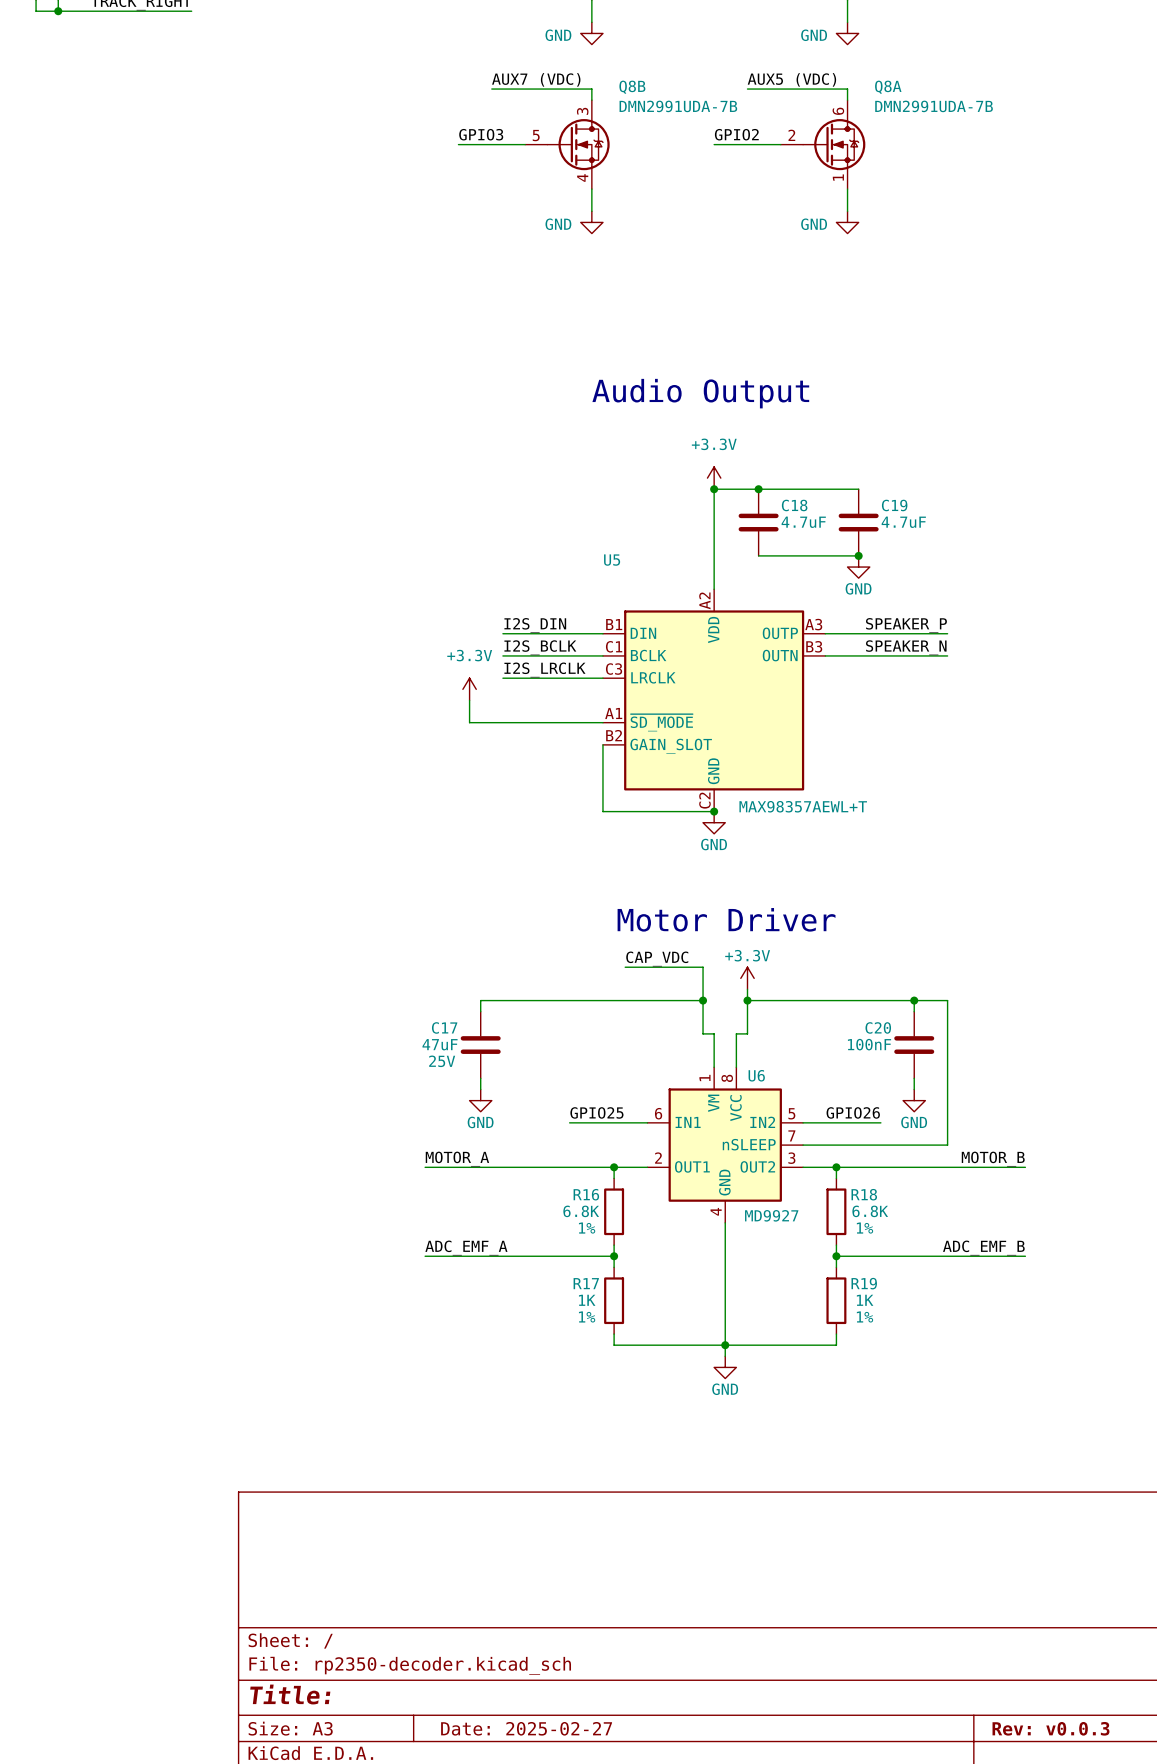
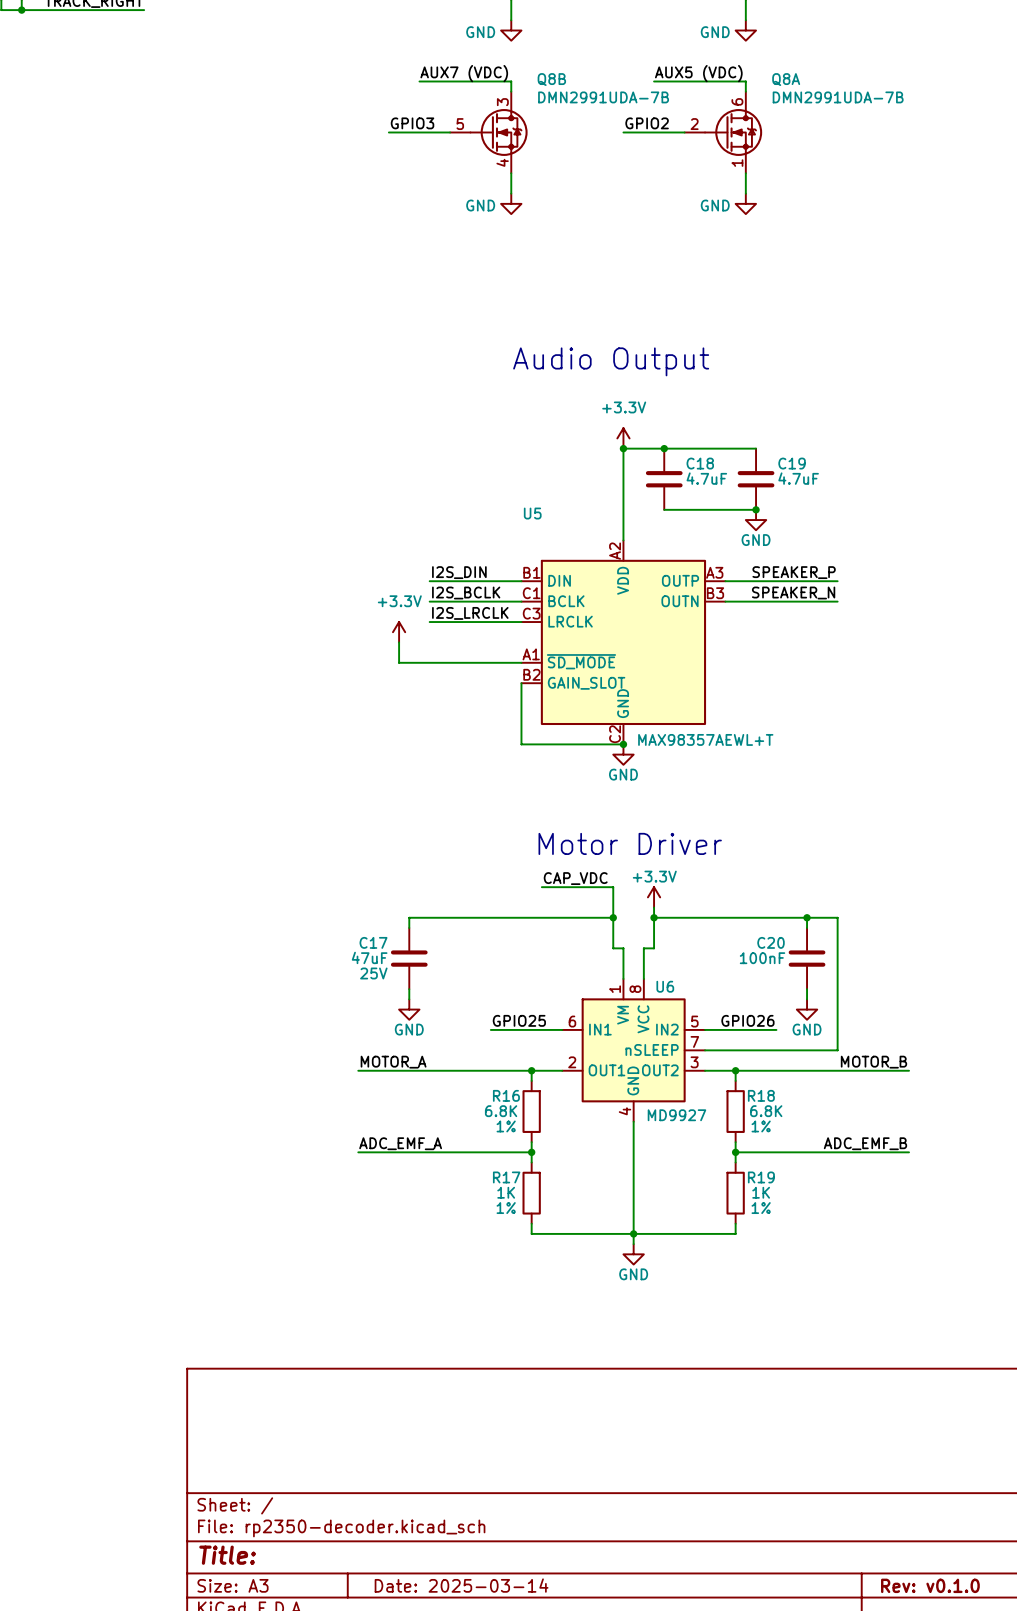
title block: Date: 2025-02-27 (526, 1728) -> Date: 2025-03-14 (461, 1585)
title block: Rev: v0.0.3 (1050, 1728) -> Rev: v0.1.0 (930, 1585)

